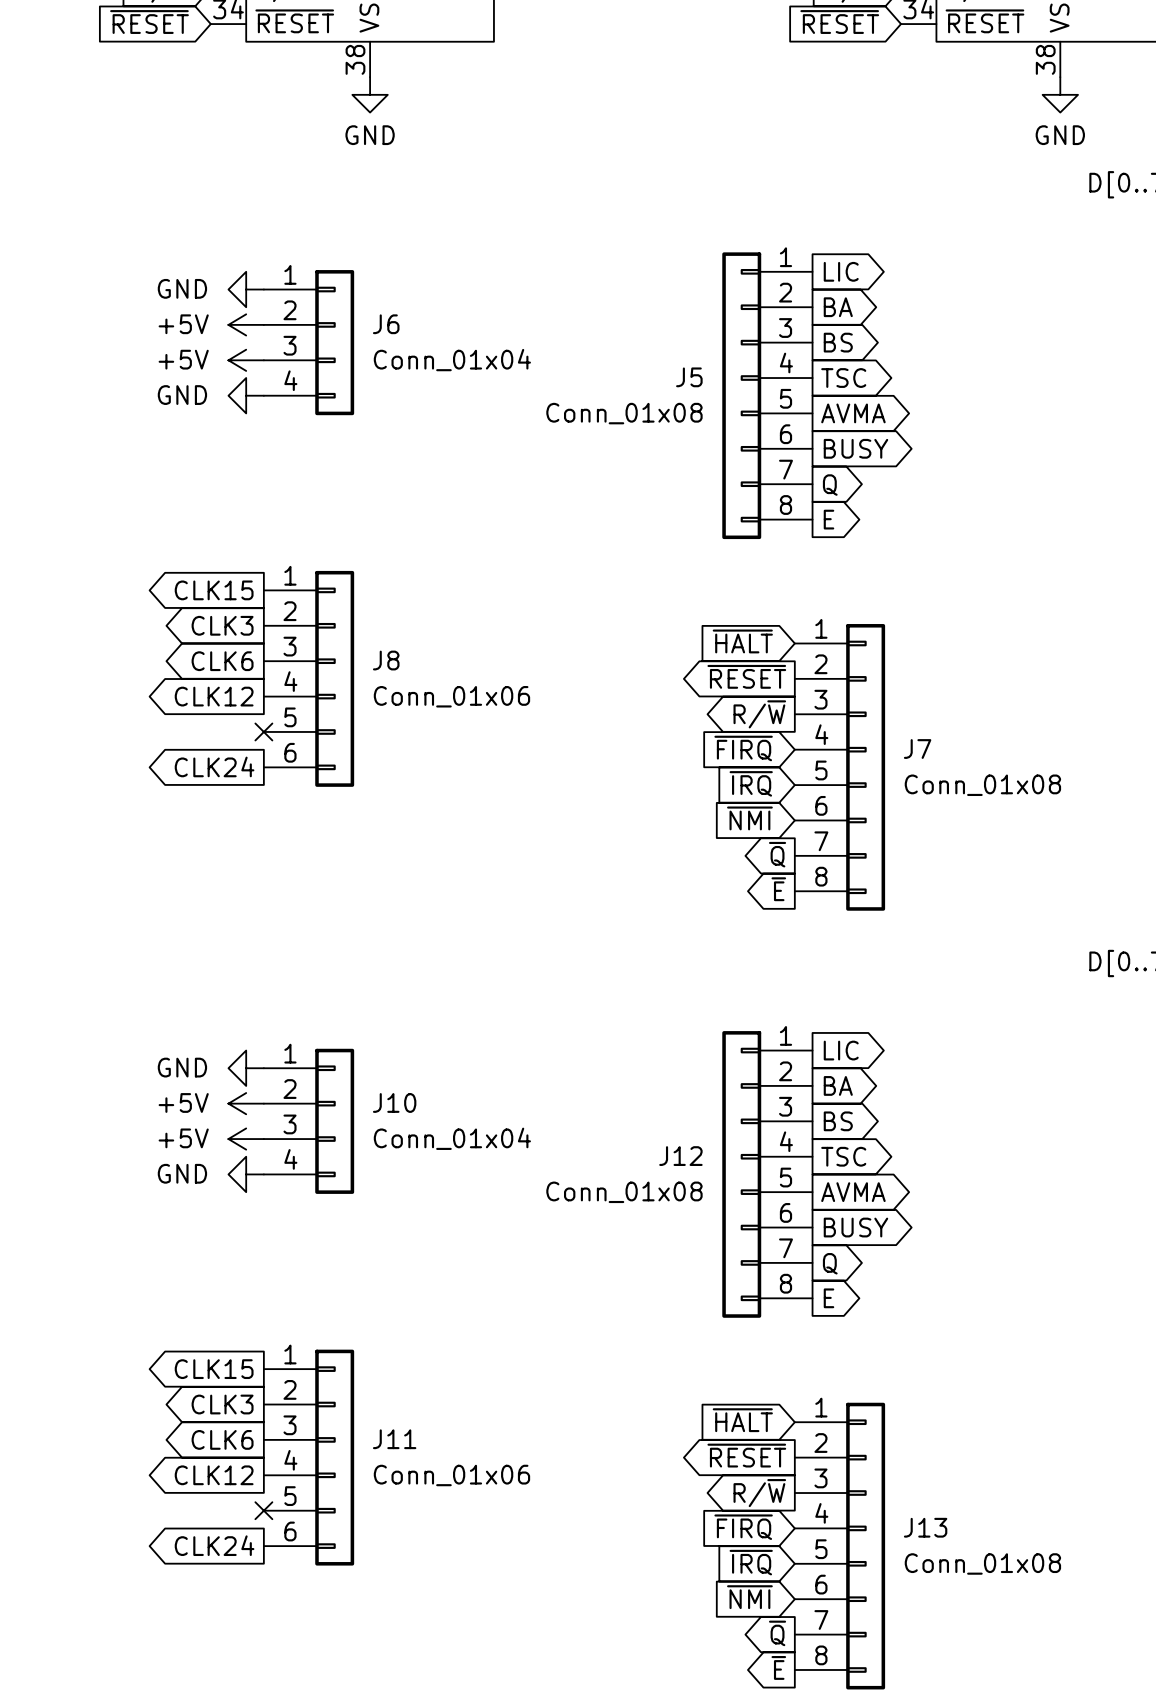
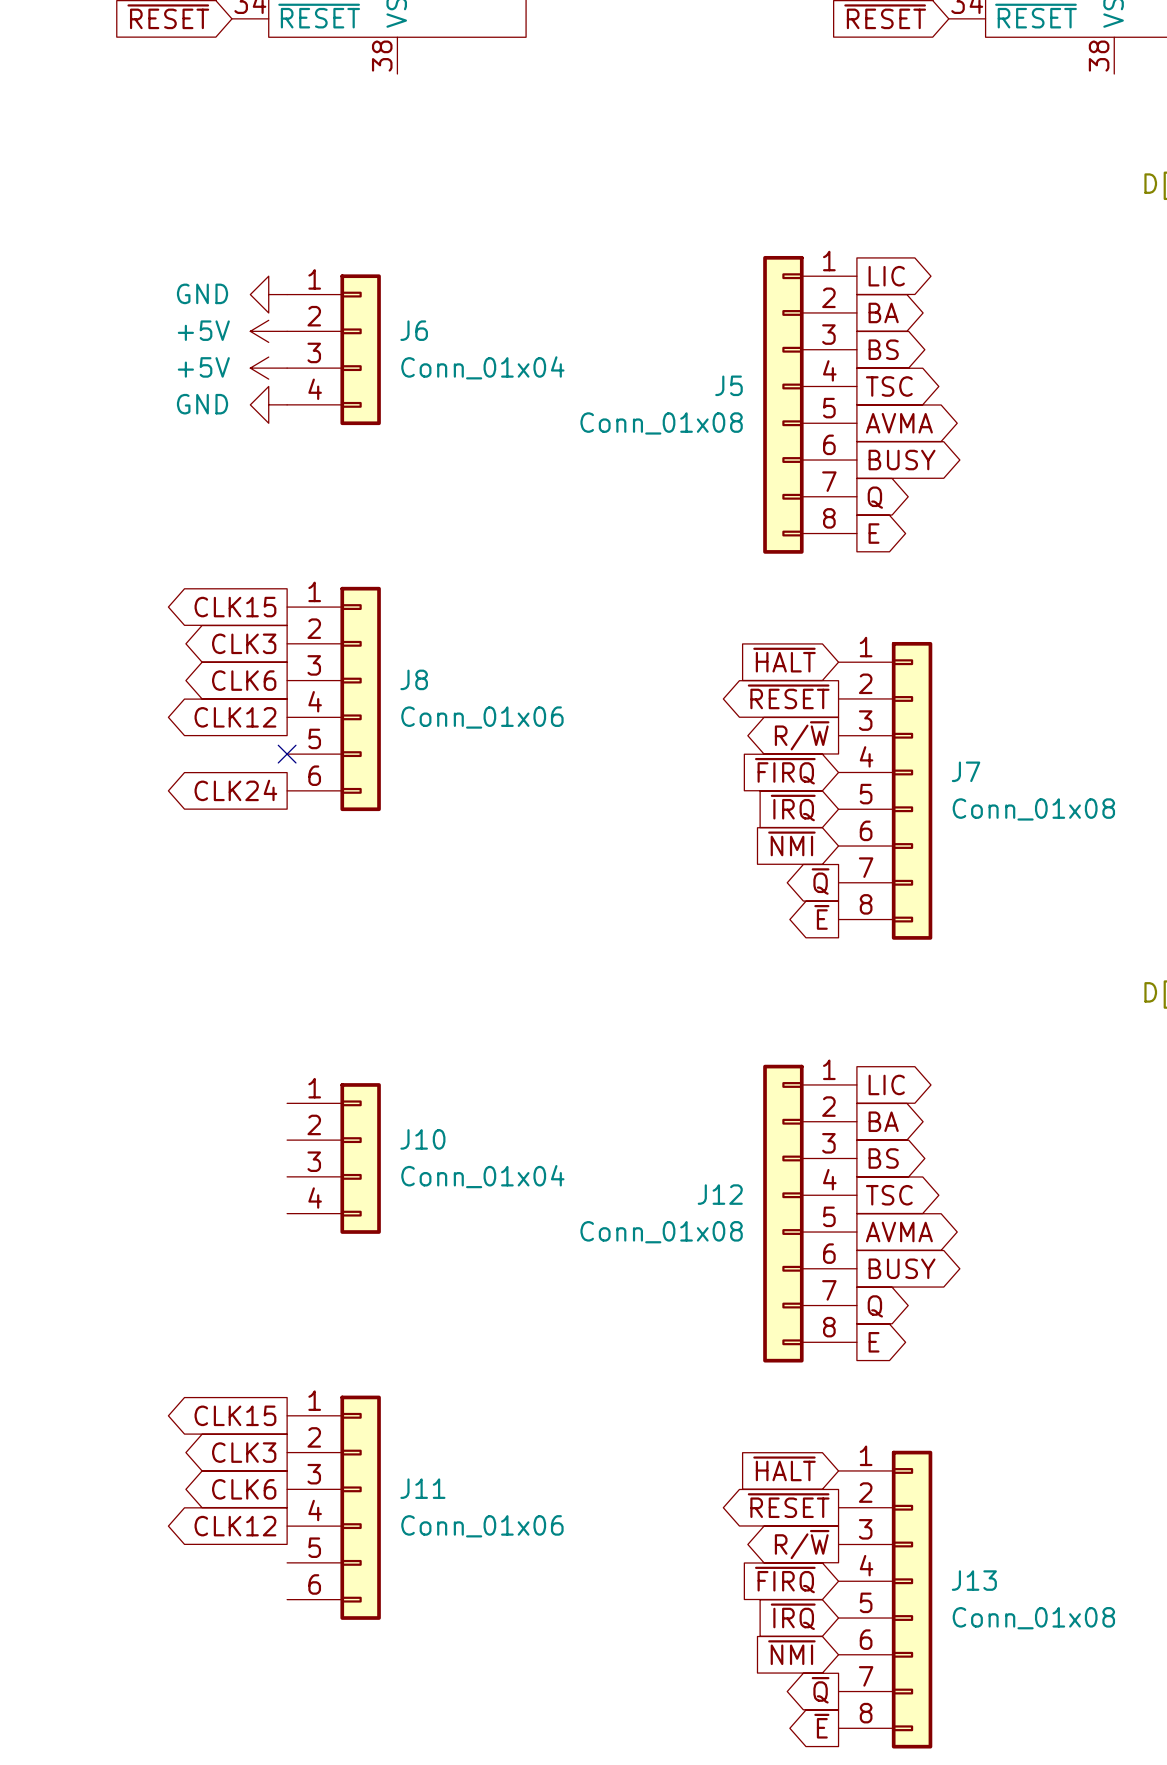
power symbol: GND (370, 94) -> none
power symbol: GND (1060, 94) -> none
power symbol: GND (246, 1068) -> none
power symbol: +5V (246, 1103) -> none
power symbol: +5V (246, 1139) -> none
power symbol: GND (246, 1174) -> none
no-connect mark: (263, 1510) -> none
global label: CLK24 (214, 1545) -> none

